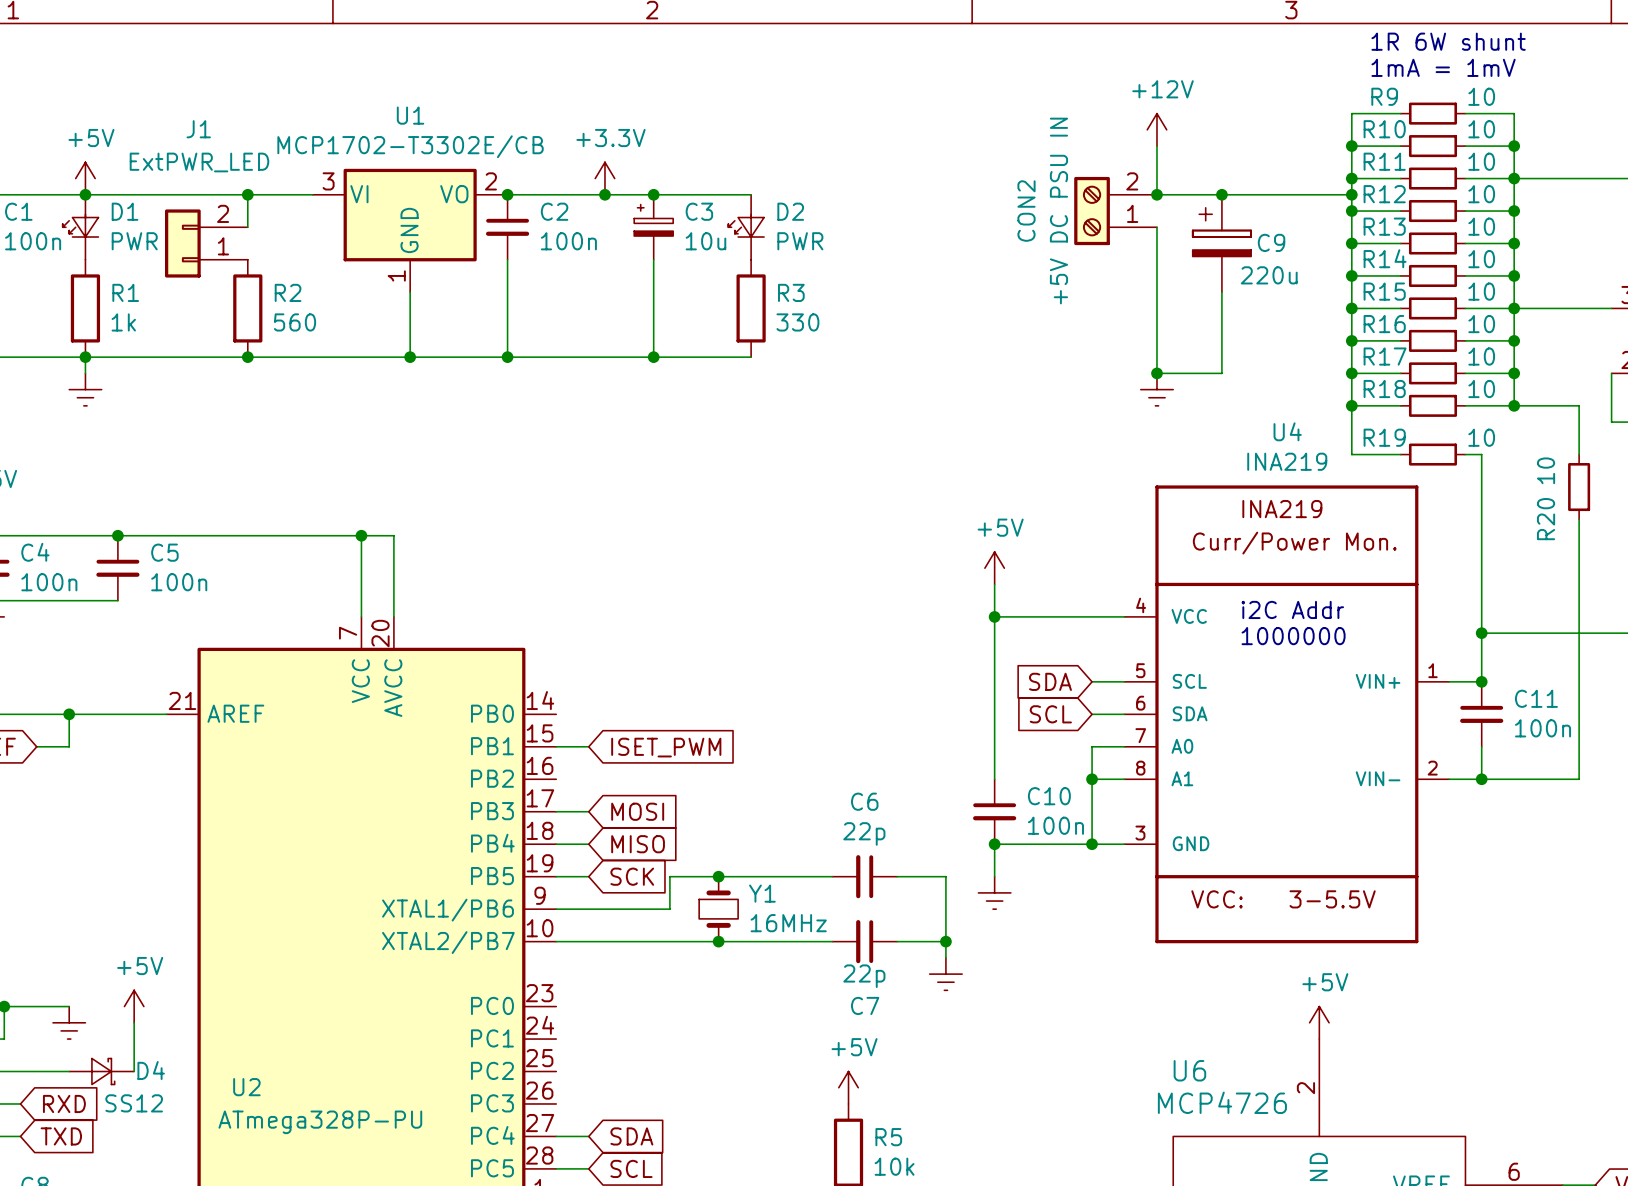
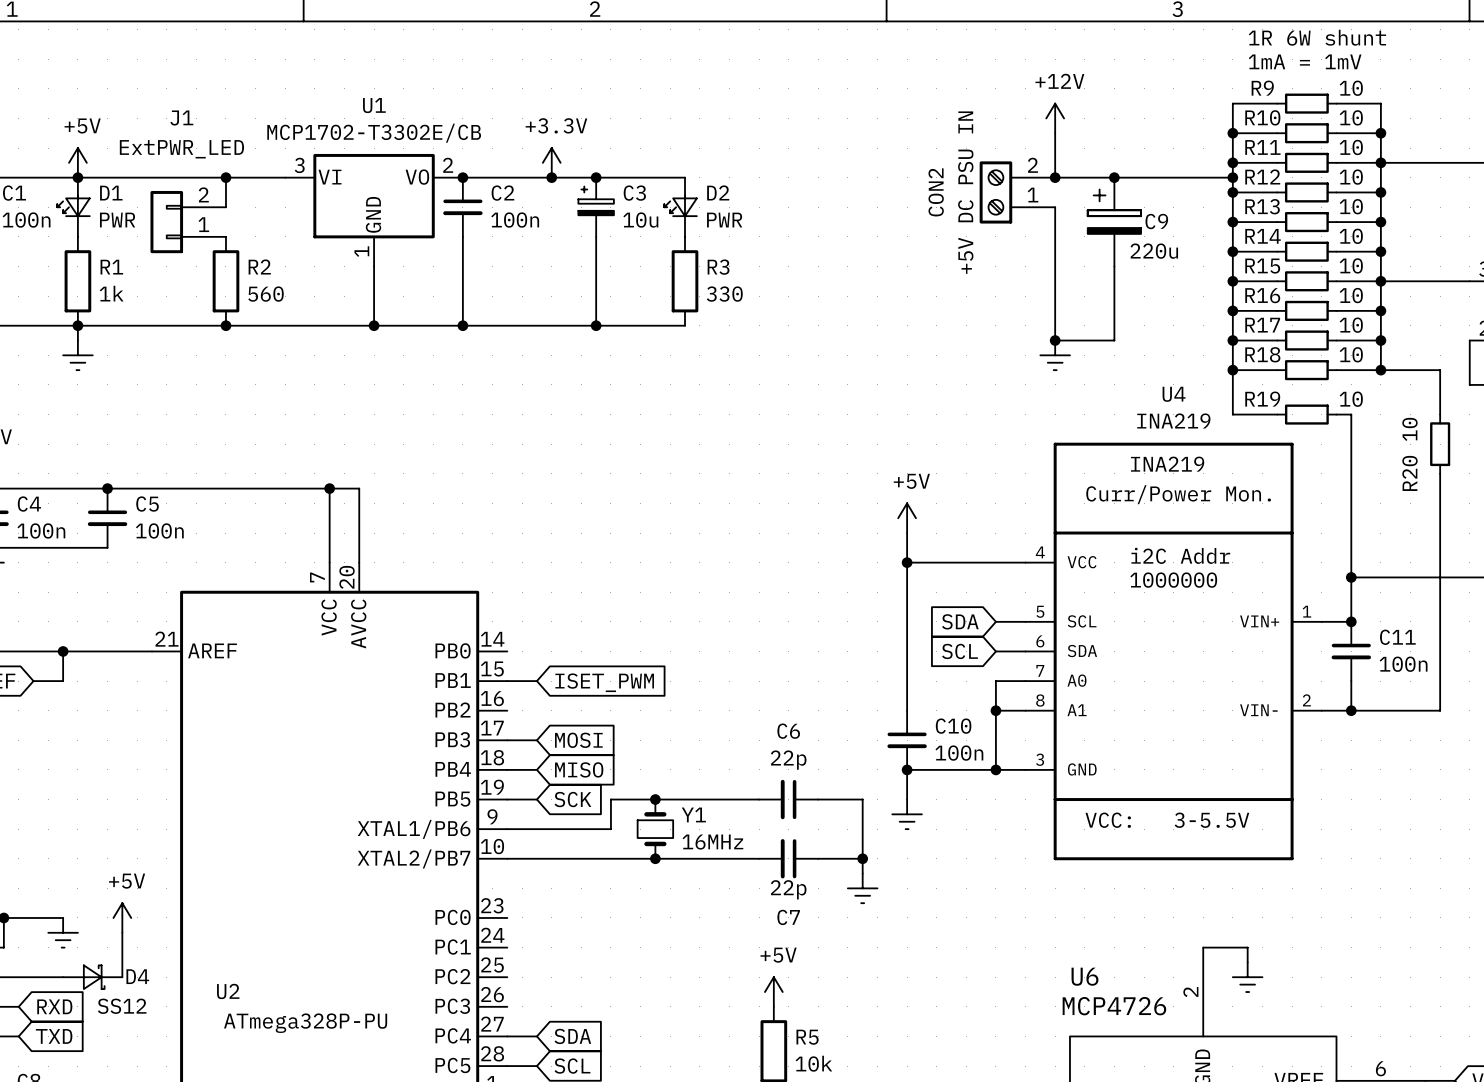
power symbol: +5V (1319, 1022) -> none
wire: none -> (1203, 947) (1247, 947) (1247, 962)
power symbol: none -> (1247, 977)

